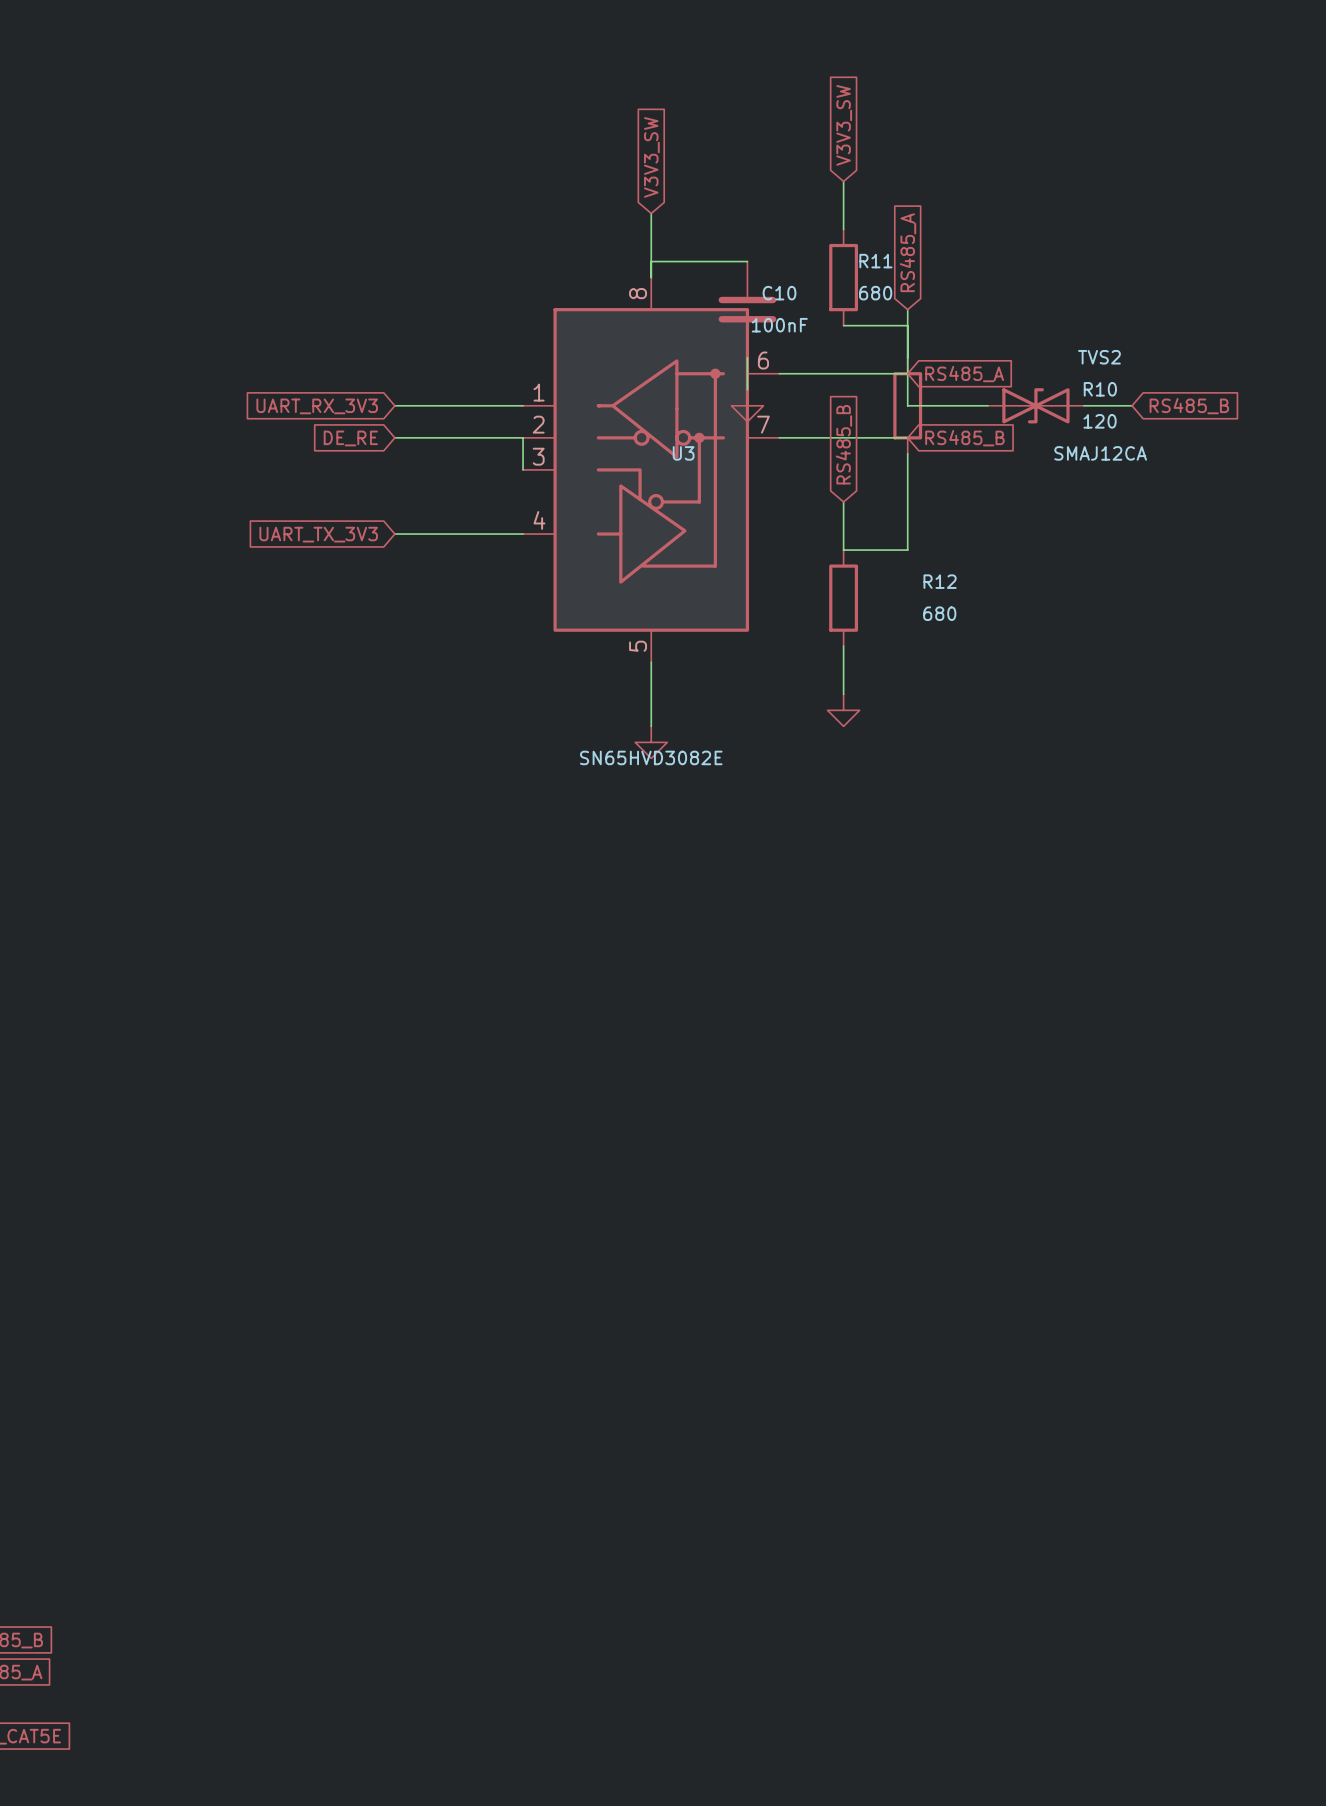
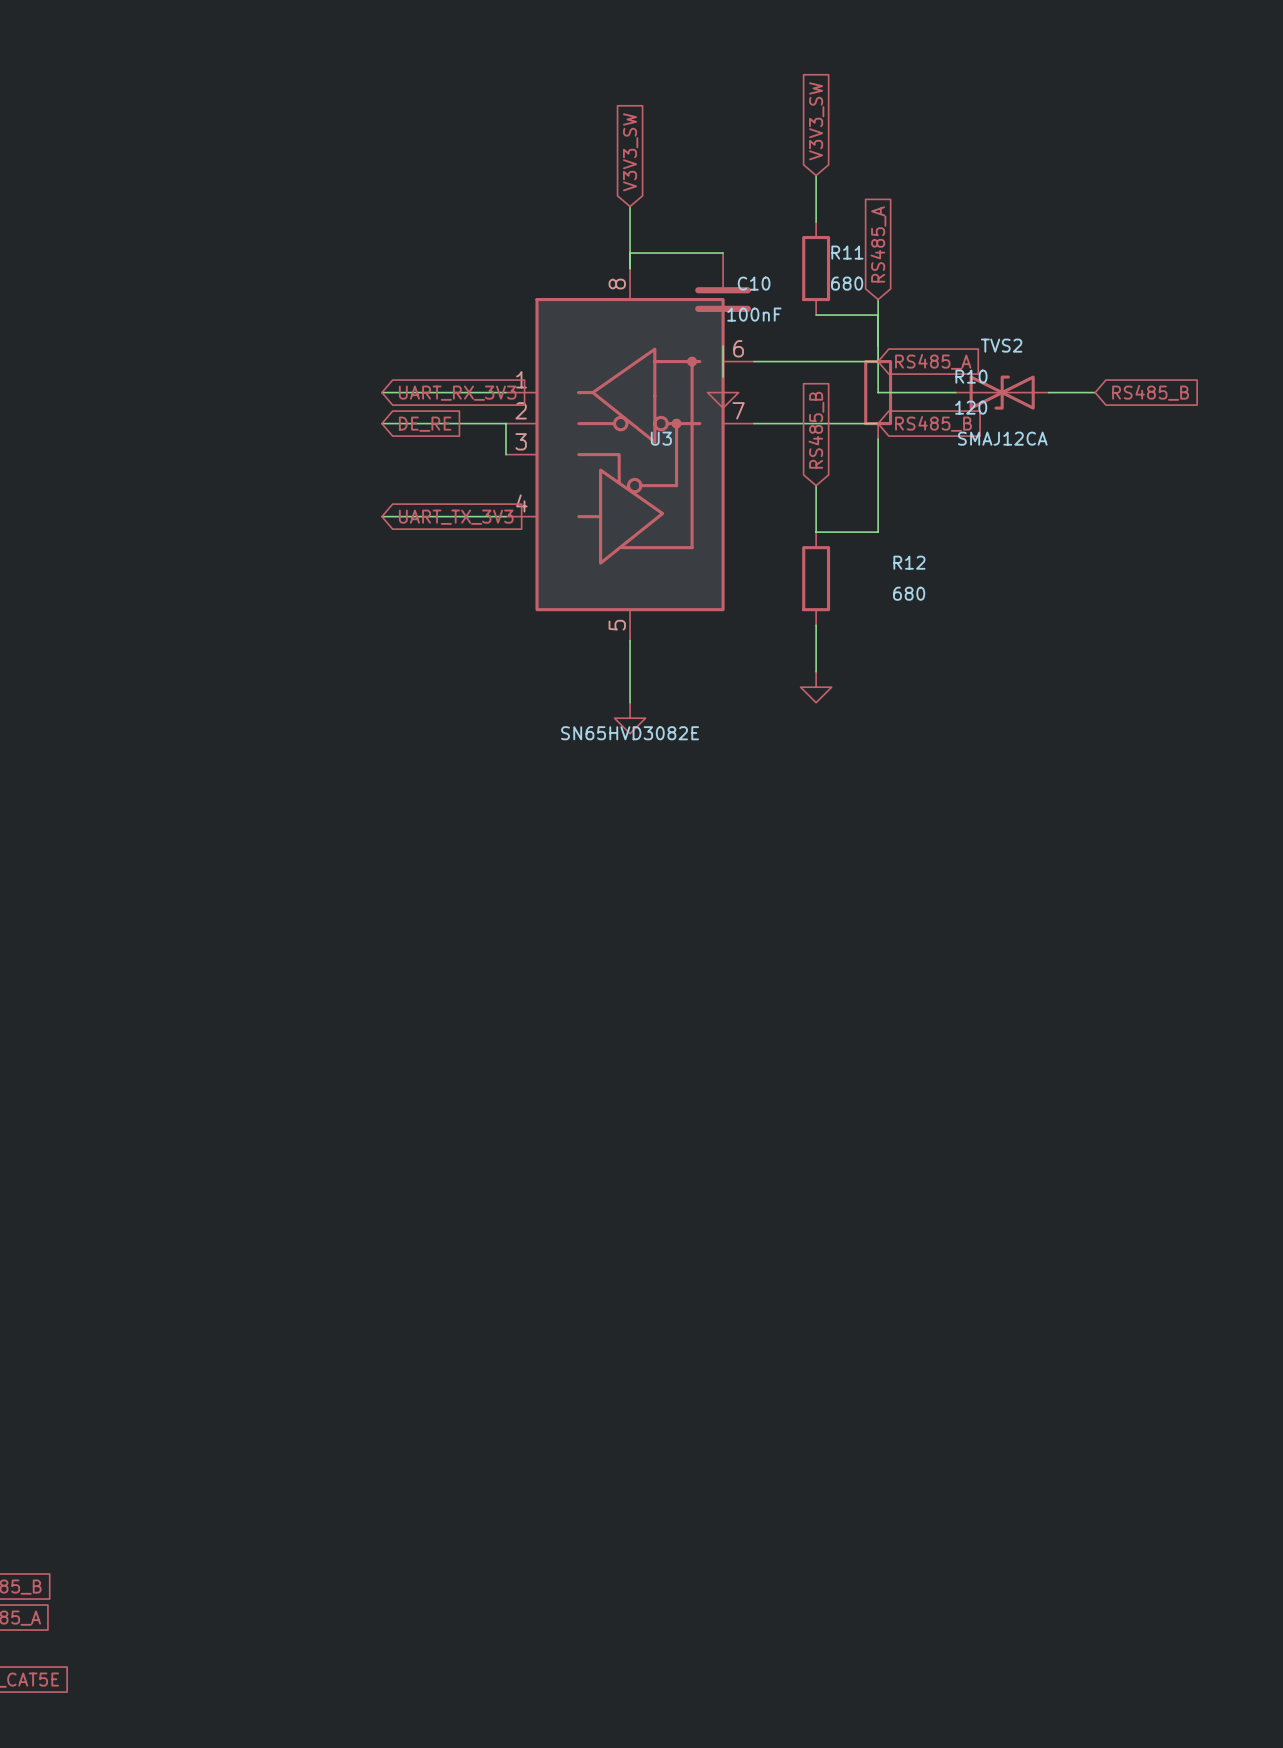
TVS2 name position: TVS2 (1099, 357) -> TVS2 (1001, 345)
R10 name position: R10 (1100, 389) -> R10 (971, 376)
global label rotation: 0° (317, 406) -> 180° (457, 393)
R10 value position: 120 (1100, 421) -> 120 (971, 407)
global label rotation: 0° (350, 438) -> 180° (425, 424)
global label position: DE_RE (350, 438) -> DE_RE (425, 424)
TVS2 value position: SMAJ12CA (1100, 453) -> SMAJ12CA (1002, 438)
global label rotation: 0° (318, 534) -> 180° (456, 517)

